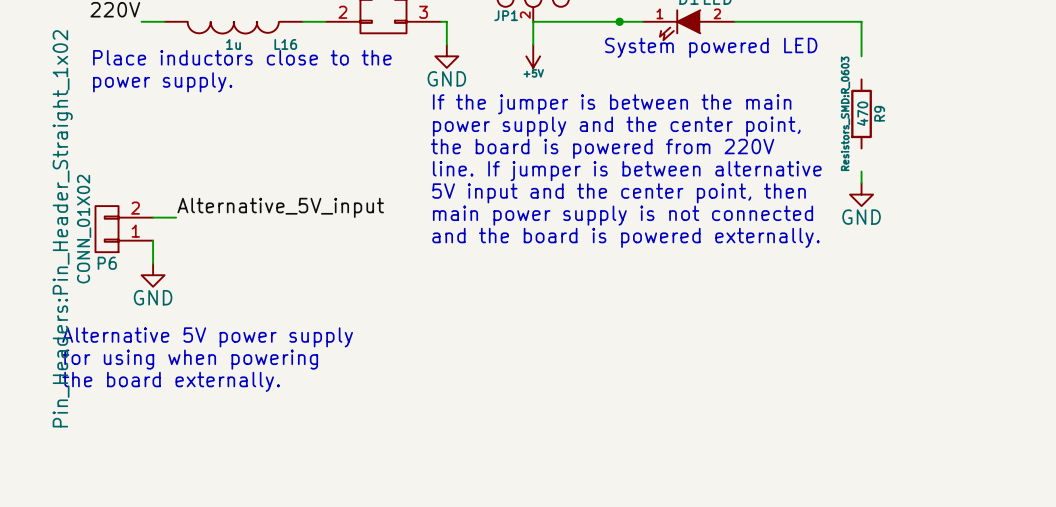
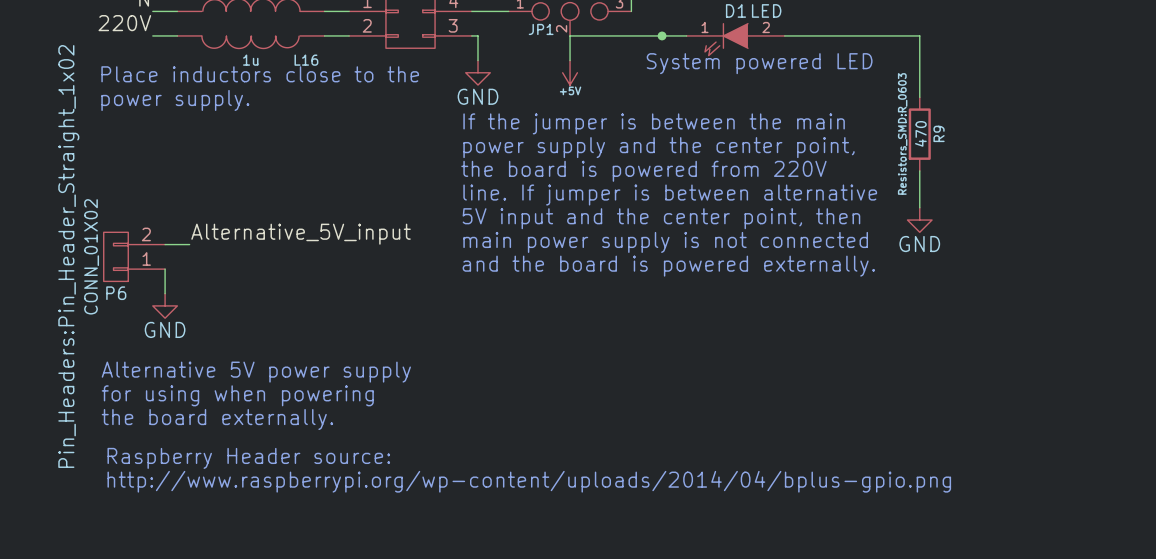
wire: none -> (919, 72) (919, 97)
wire: none -> (919, 170) (919, 195)
text position: Alternative 5V power supply (207, 337) -> Alternative 5V power supply (256, 372)
text position: for using when powering (190, 359) -> for using when powering (237, 395)
text position: the board externally. (171, 381) -> the board externally. (217, 419)
text: none -> Raspberry Header source: (248, 458)
text: none -> http://www.raspberrypi.org/wp-content/uploads/2014/04/bplus-gpio.png (529, 481)

